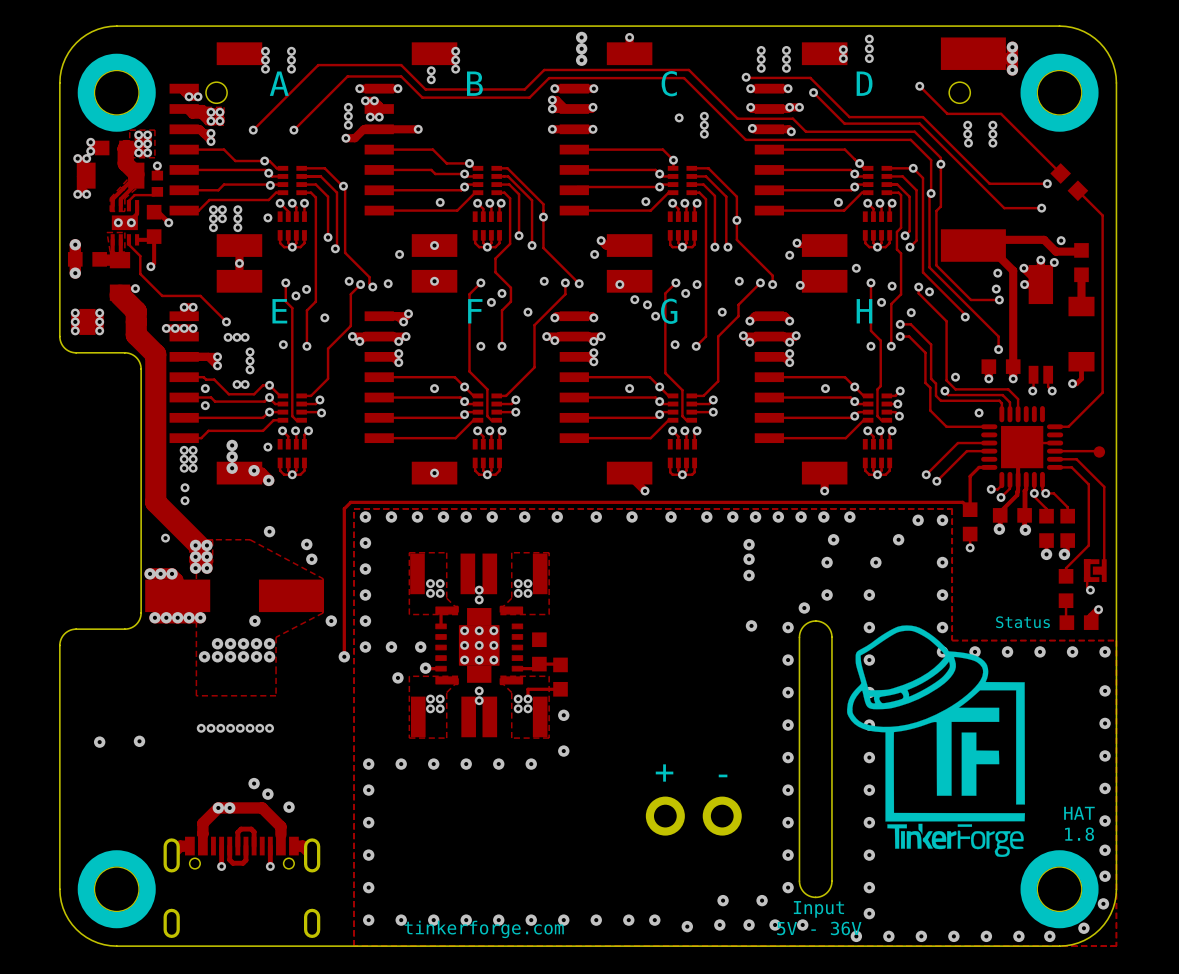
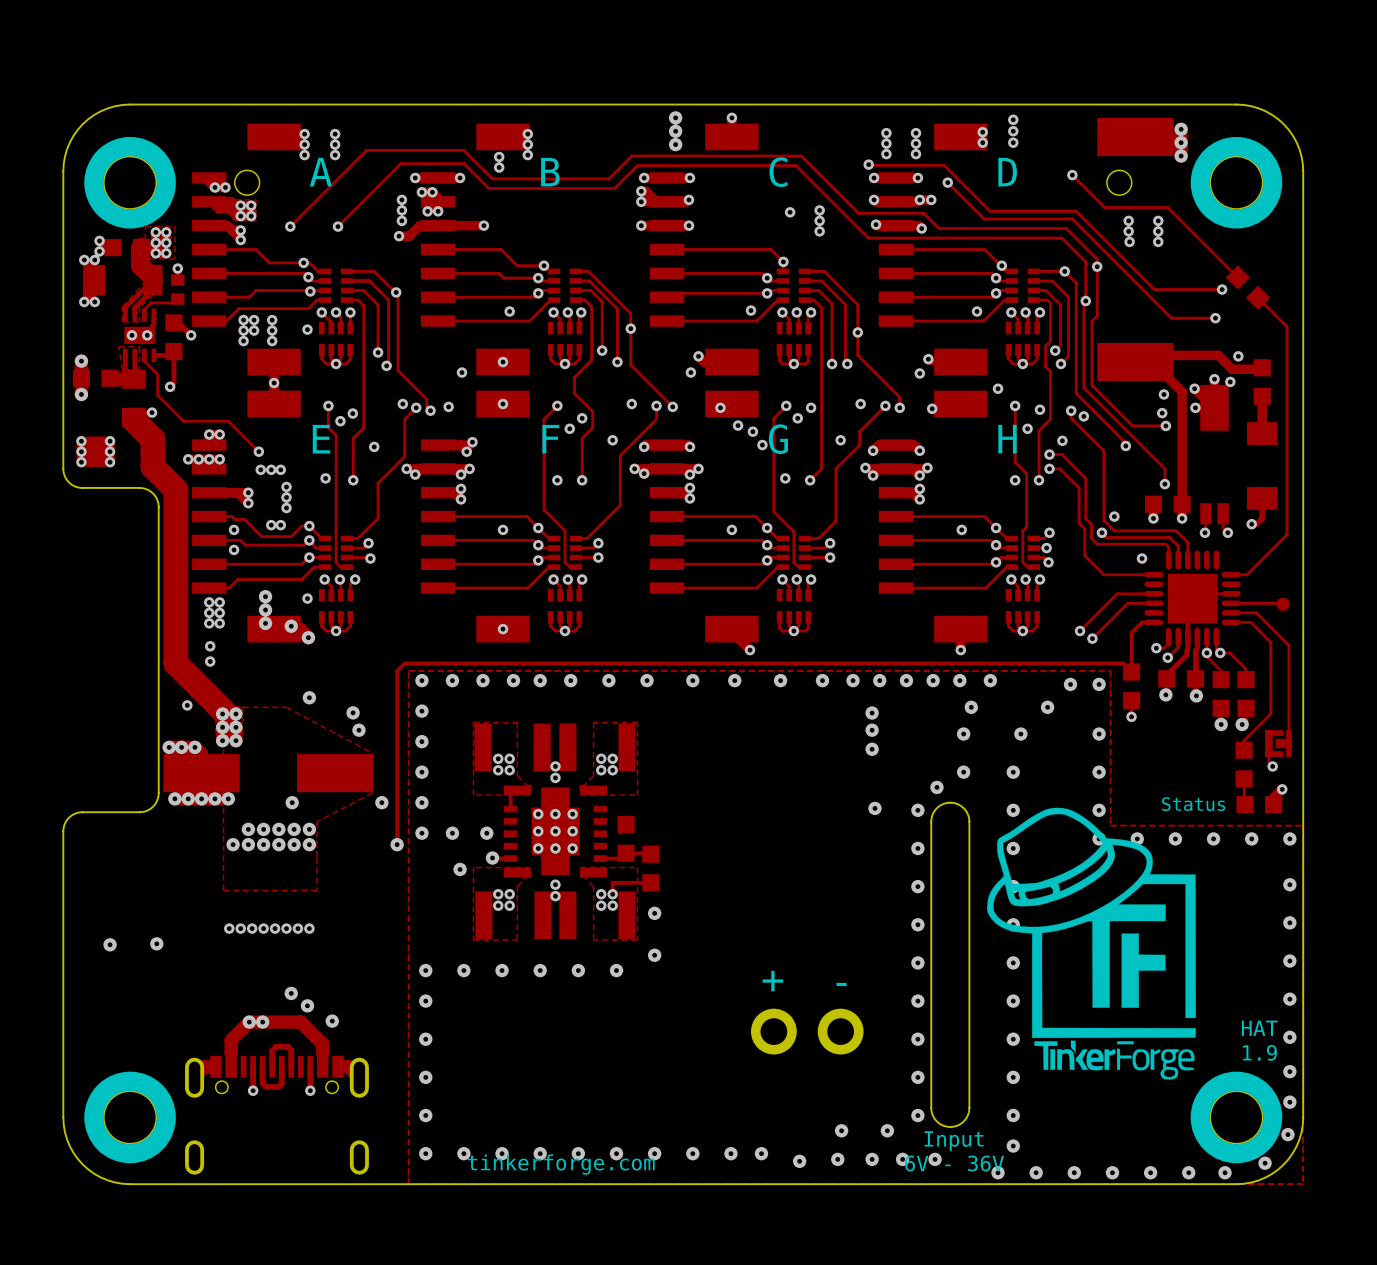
text: 1.8 (1079, 834) -> 1.9 (1259, 1052)
text: 5V - 36V (819, 928) -> 6V - 36V (954, 1163)

